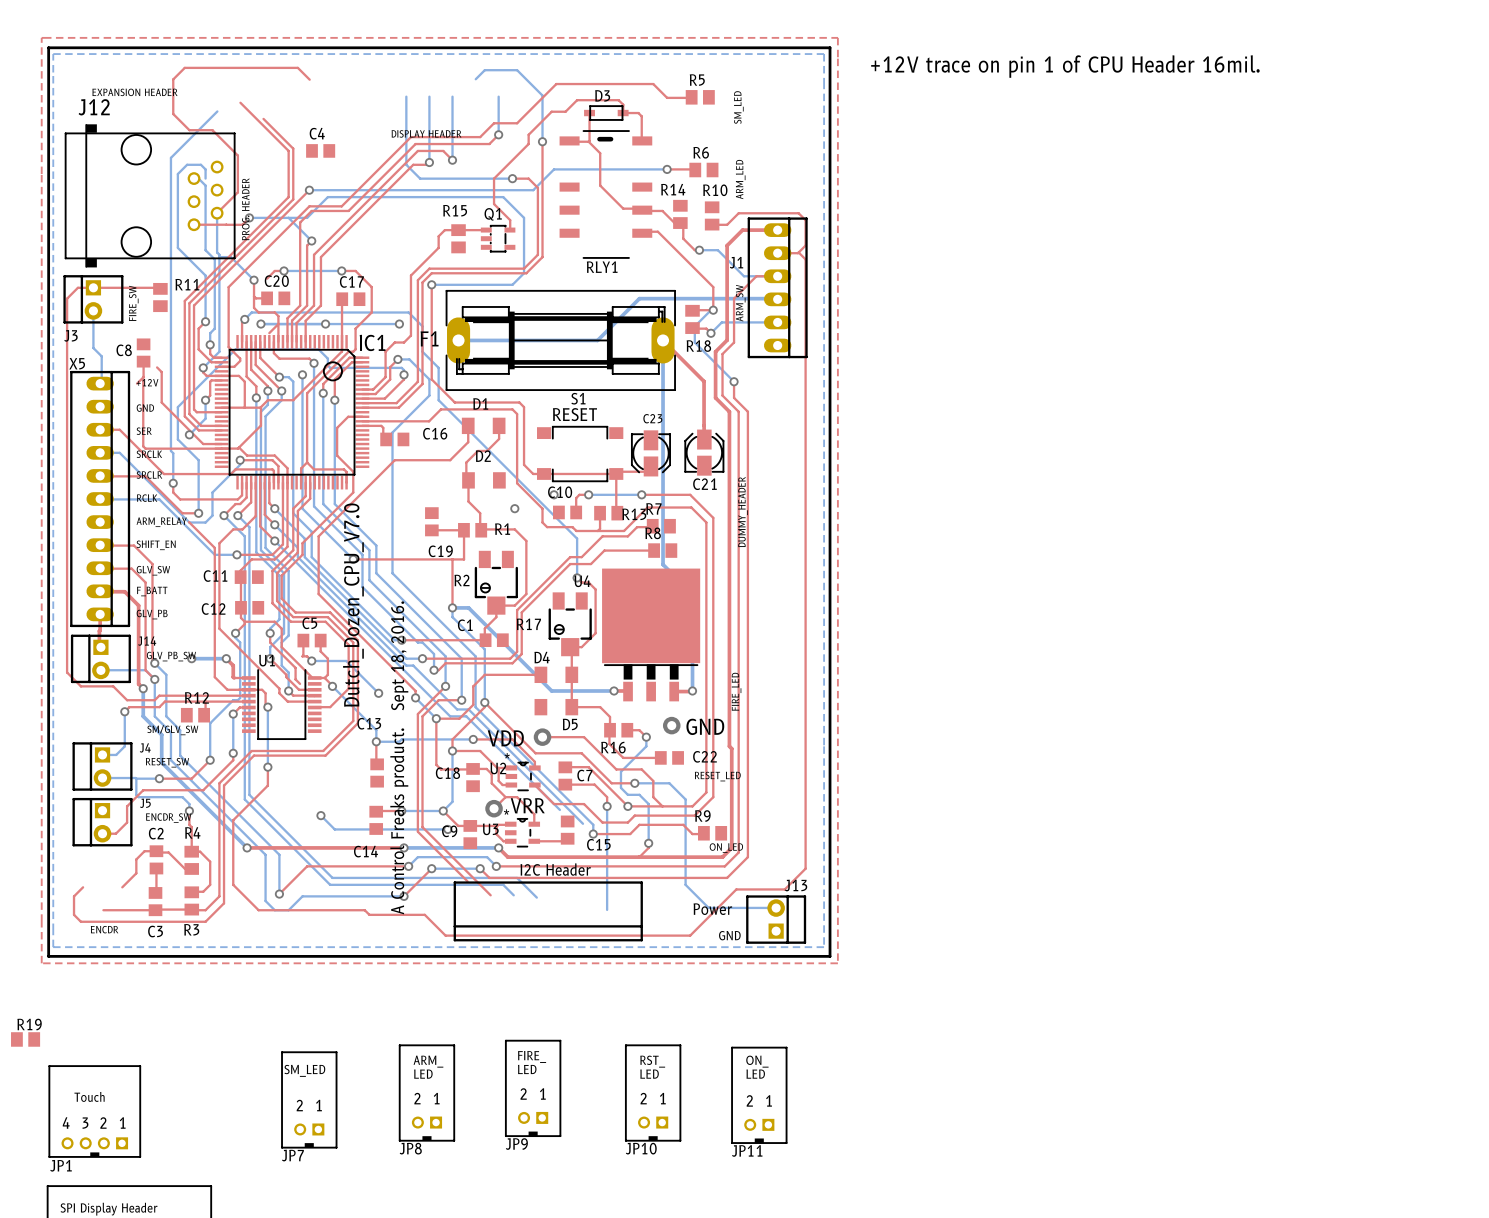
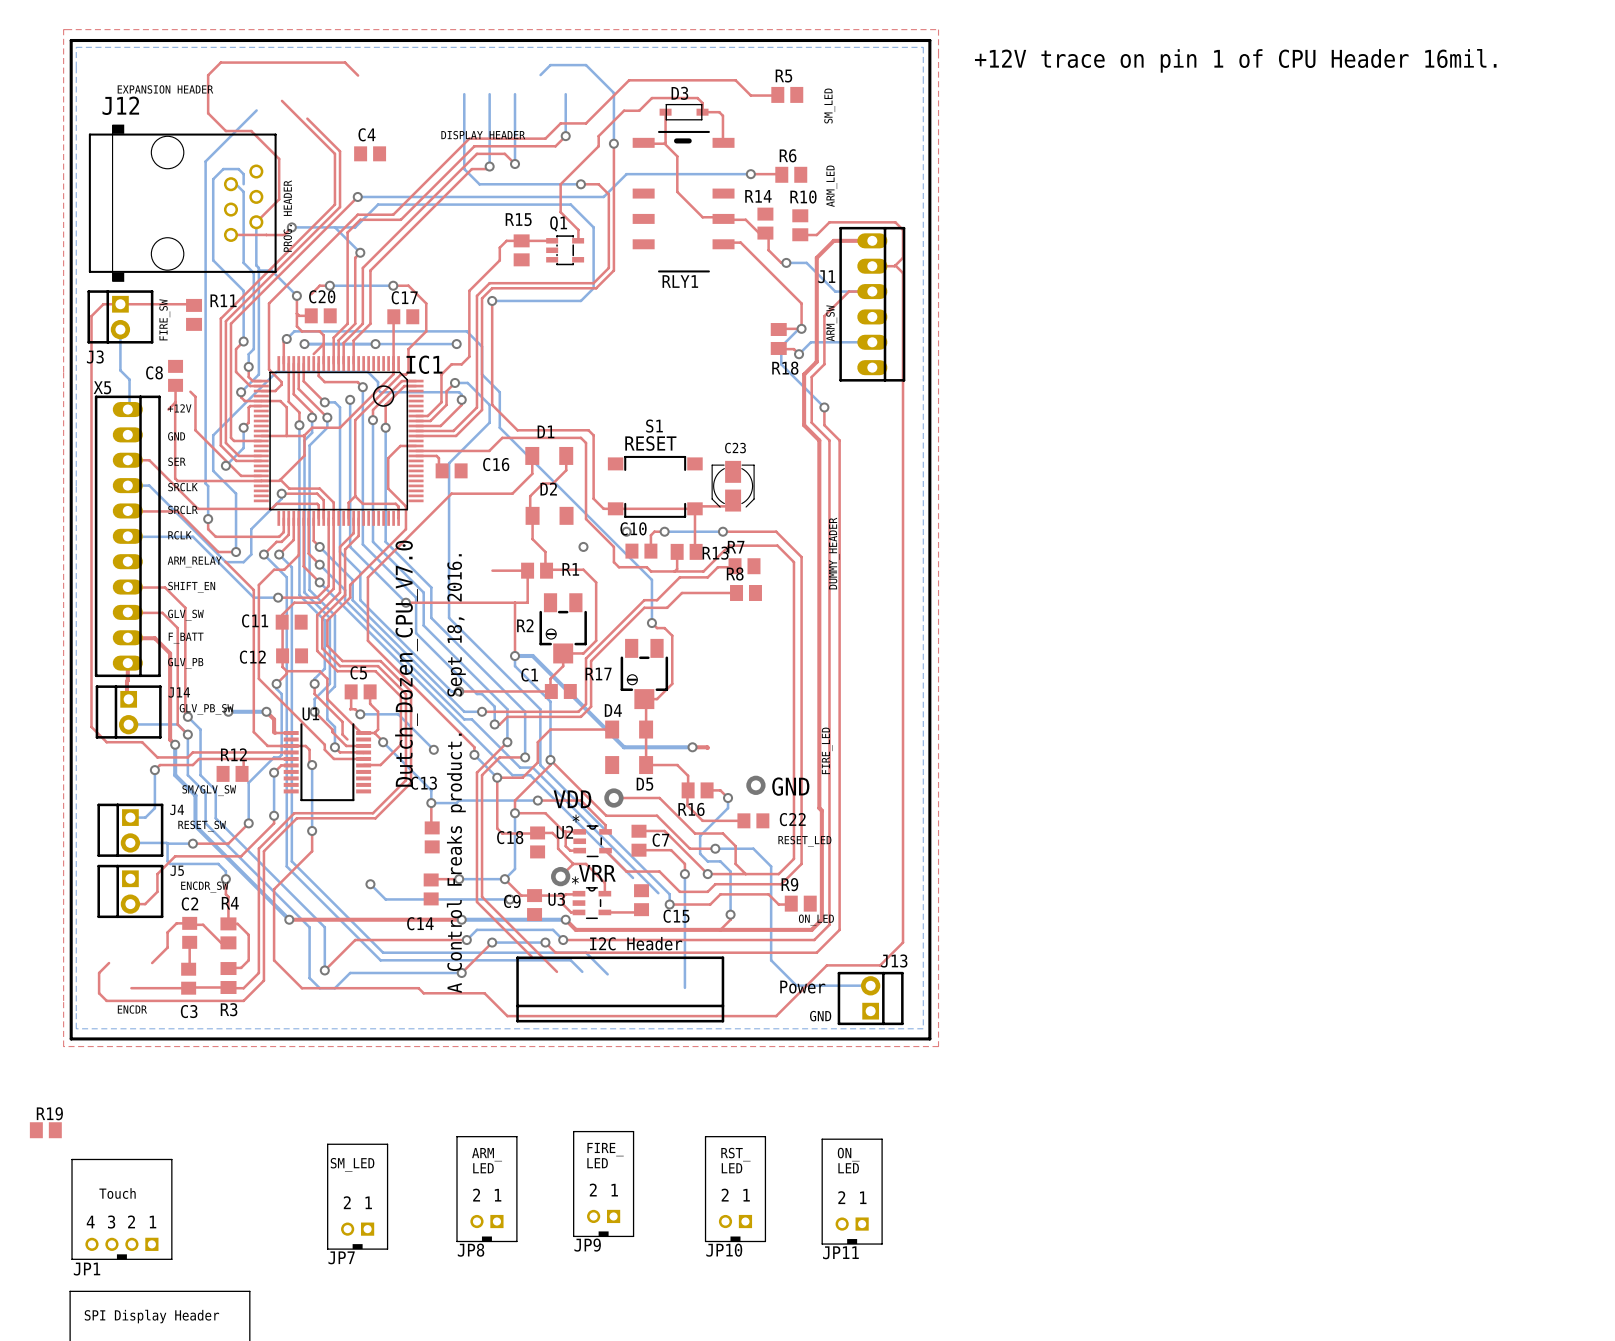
bottom track: (776, 298) (639, 298) (597, 340) (458, 340) -> none
F1: (560, 340) -> none
bottom track: (663, 340) (663, 564) (692, 594) (692, 690) -> none
top track: (663, 340) (704, 381) (704, 439) -> none
C21: (704, 452) -> none
C19: (431, 521) -> none
U4: (651, 634) -> none
top track: (692, 690) (674, 691) -> none
via: (692, 690) -> none

